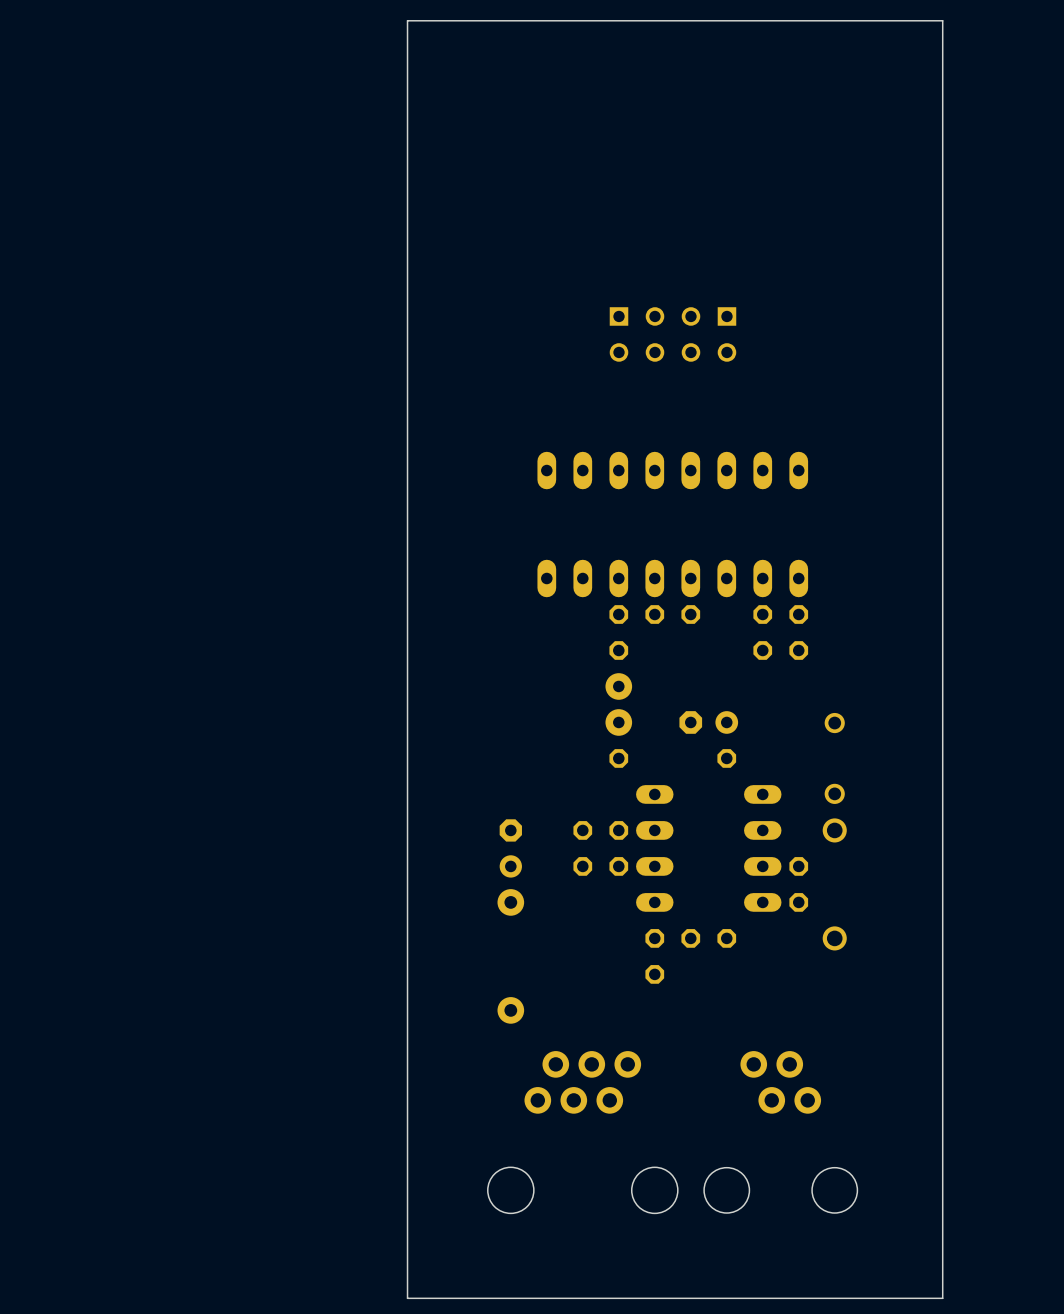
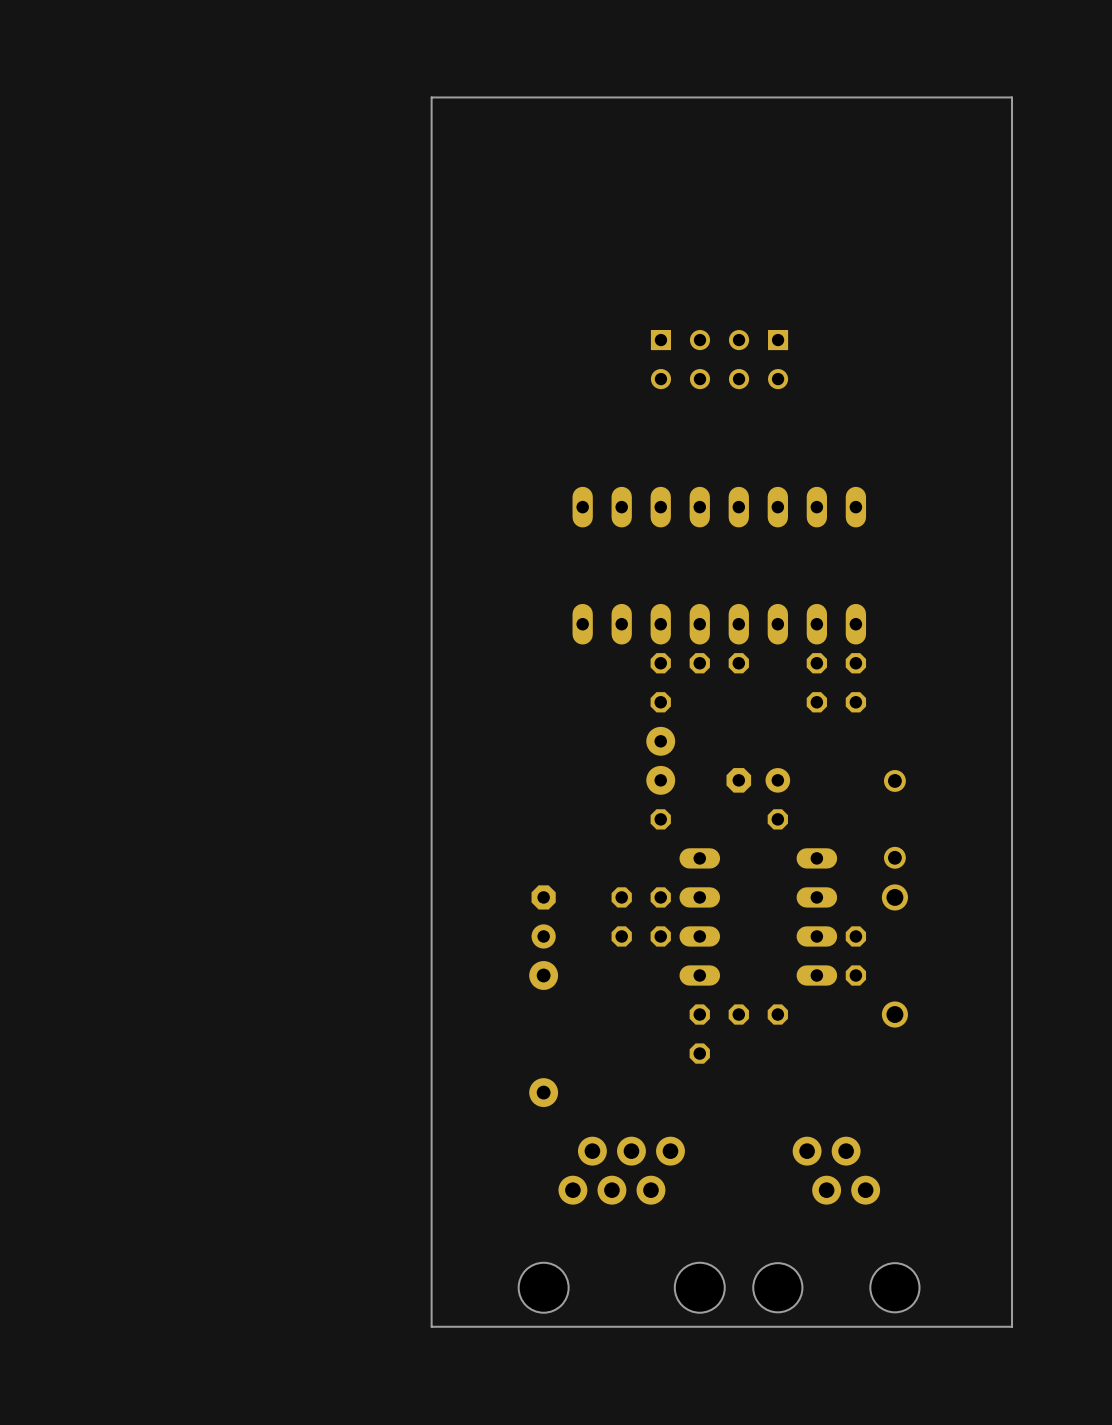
board edge: (942, 92) (942, 20) (407, 20) (407, 92) -> (1012, 97) (431, 97)
board edge: (942, 1226) (942, 1298) (407, 1298) (407, 1226) -> (1012, 1326) (431, 1326)

